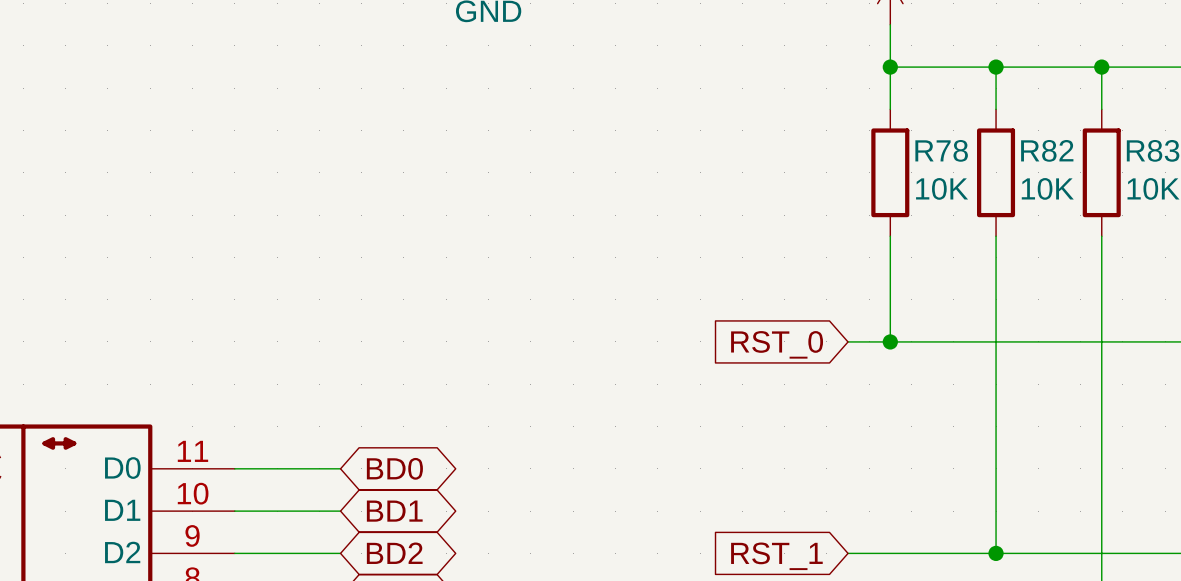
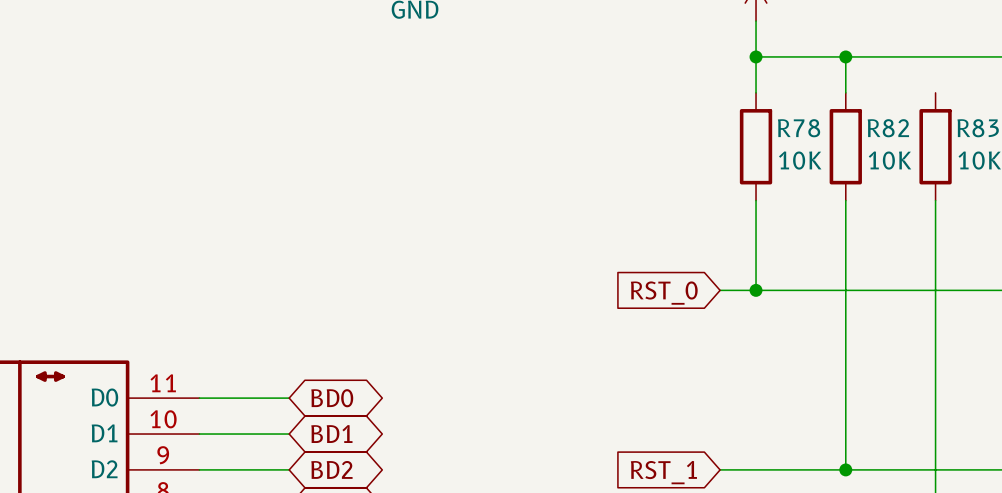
wire: (1101, 67) (1101, 109) -> none
junction: (1101, 67) -> none

